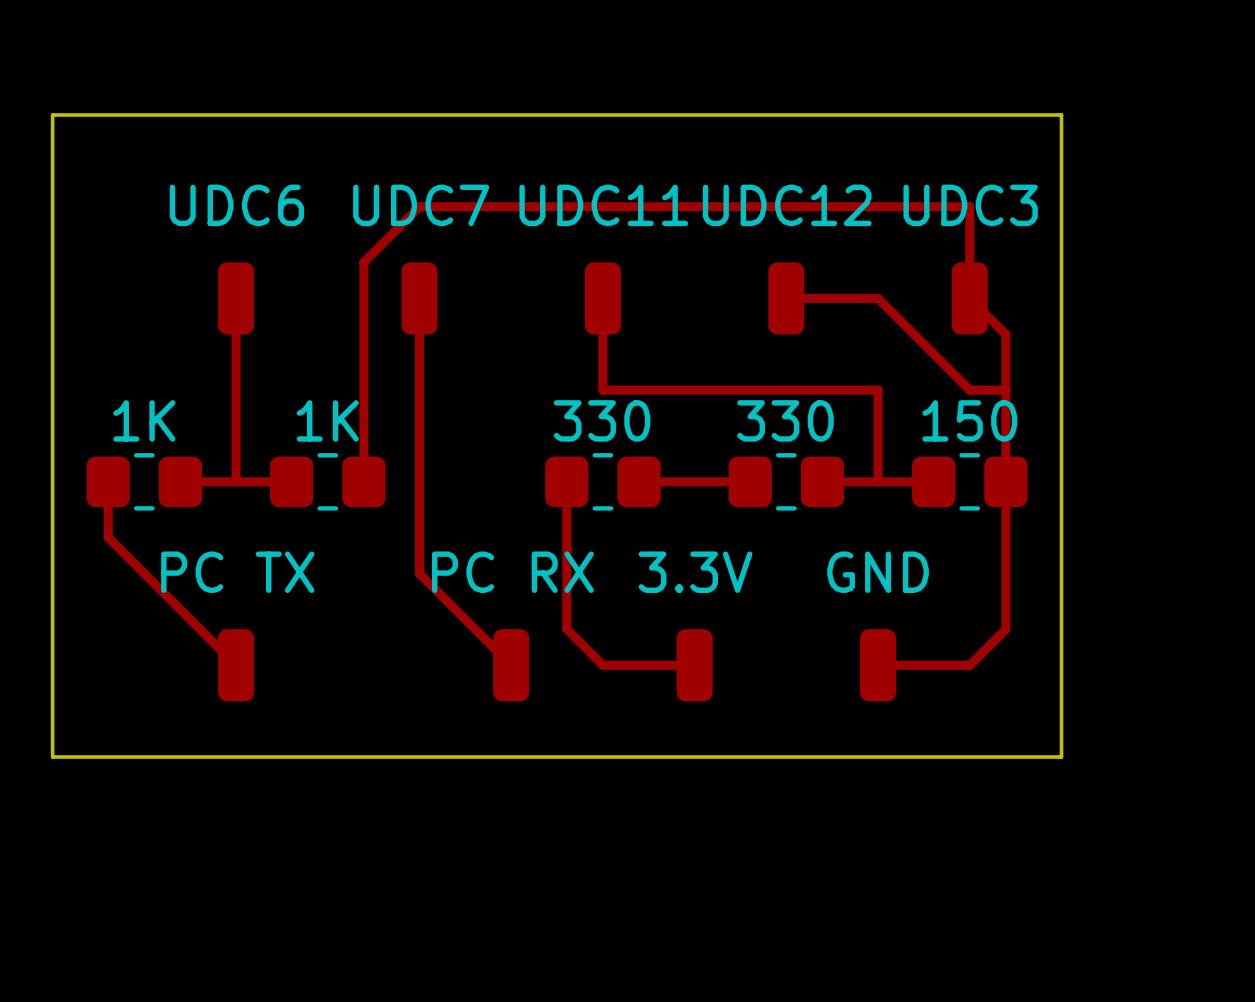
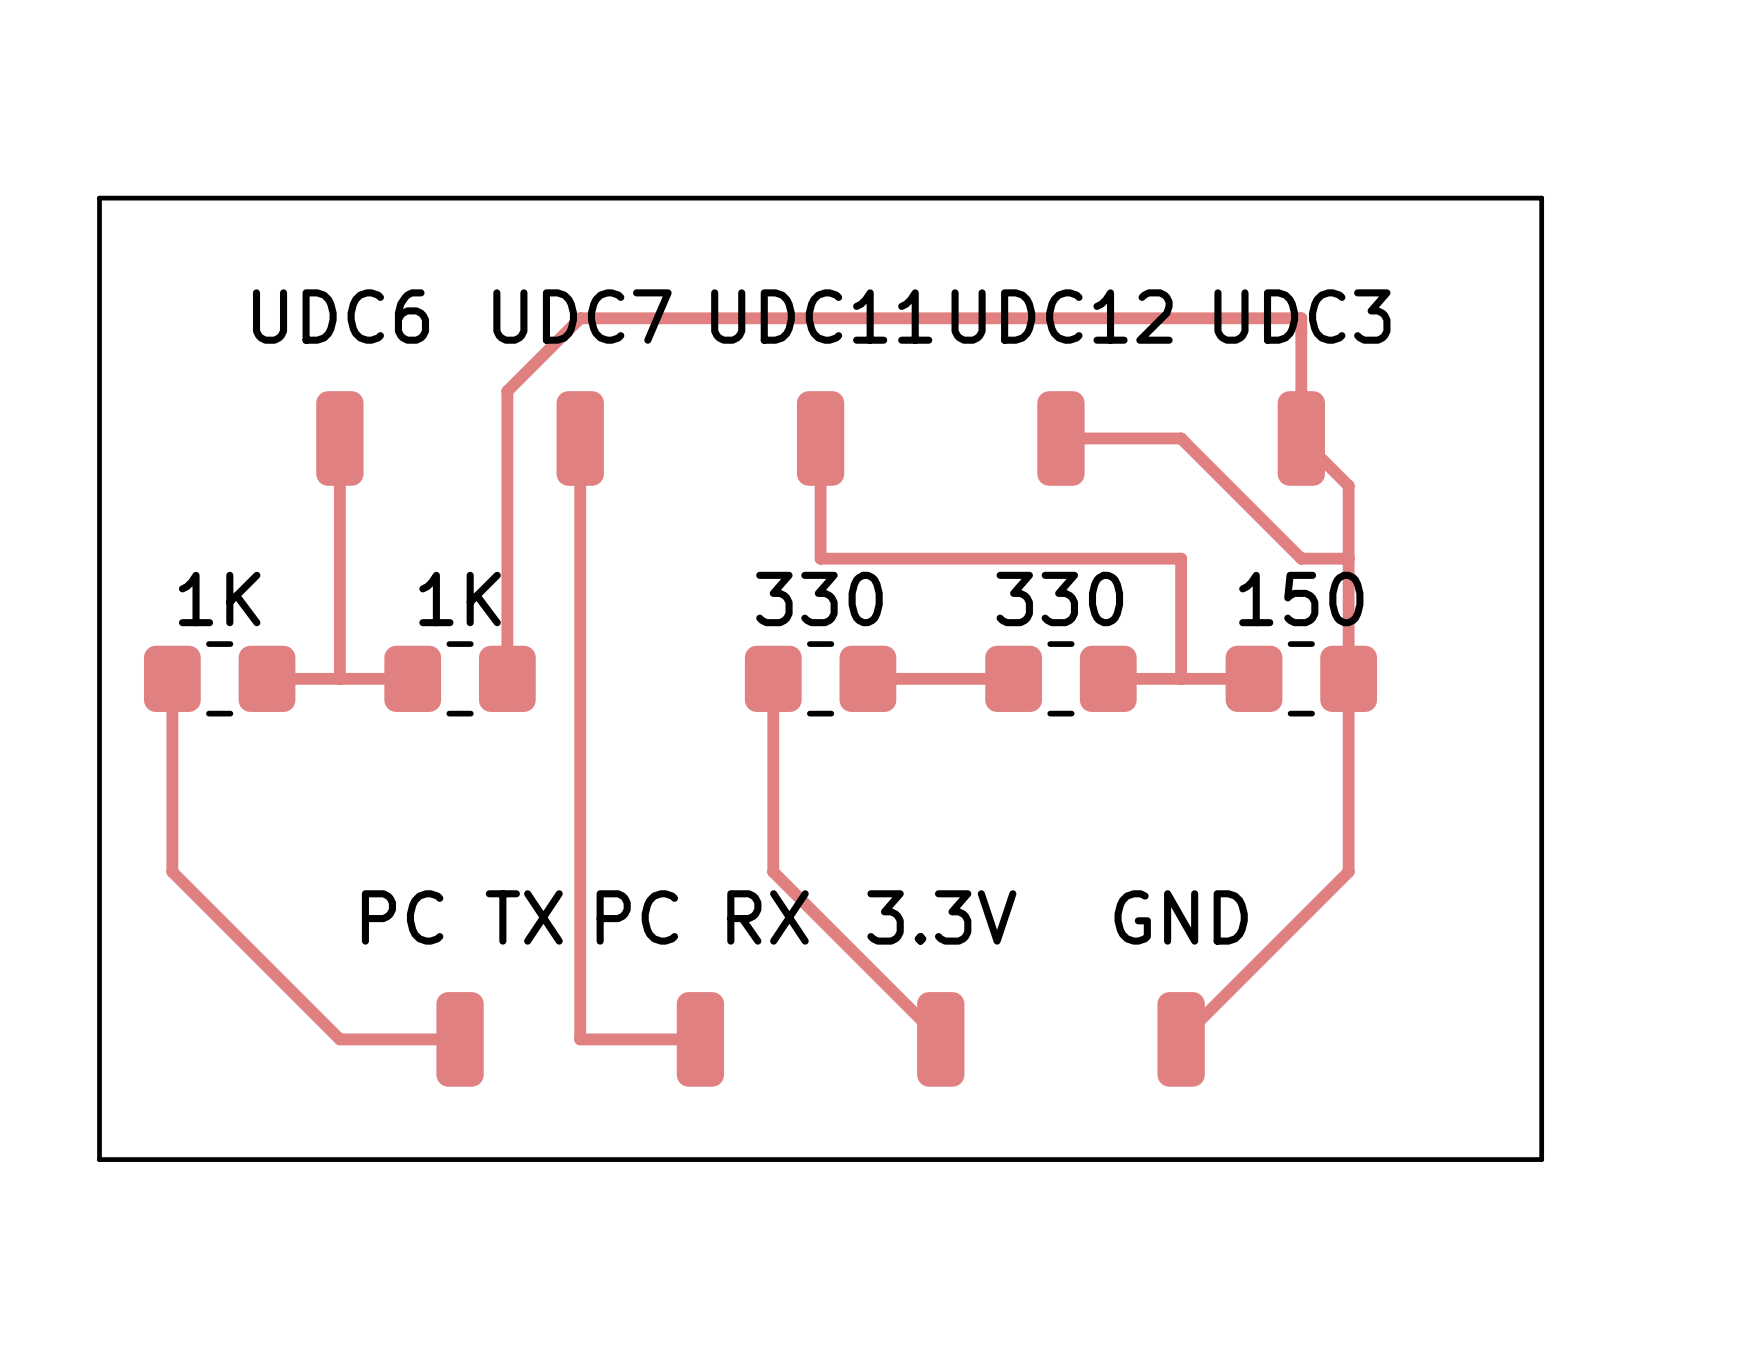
board edge: (1061, 114) (1061, 756) (52, 756) -> (1421, 198) (1541, 198) (1541, 1159) (99, 1159) (99, 1039)
top track: (108, 537) (236, 665) -> (172, 751) (172, 871) (339, 1039) (460, 1039)
top track: (419, 573) (511, 665) -> (580, 799) (580, 1039) (700, 1039)
PC TX position: (236, 665) -> (460, 1039)
PC RX position: (511, 665) -> (700, 1039)
top track: (602, 665) (694, 665) -> (820, 919) (940, 1039)
3.3V position: (694, 665) -> (940, 1039)
top track: (878, 665) (969, 665) -> (1181, 1039) (1301, 919)
GND position: (878, 665) -> (1181, 1039)

